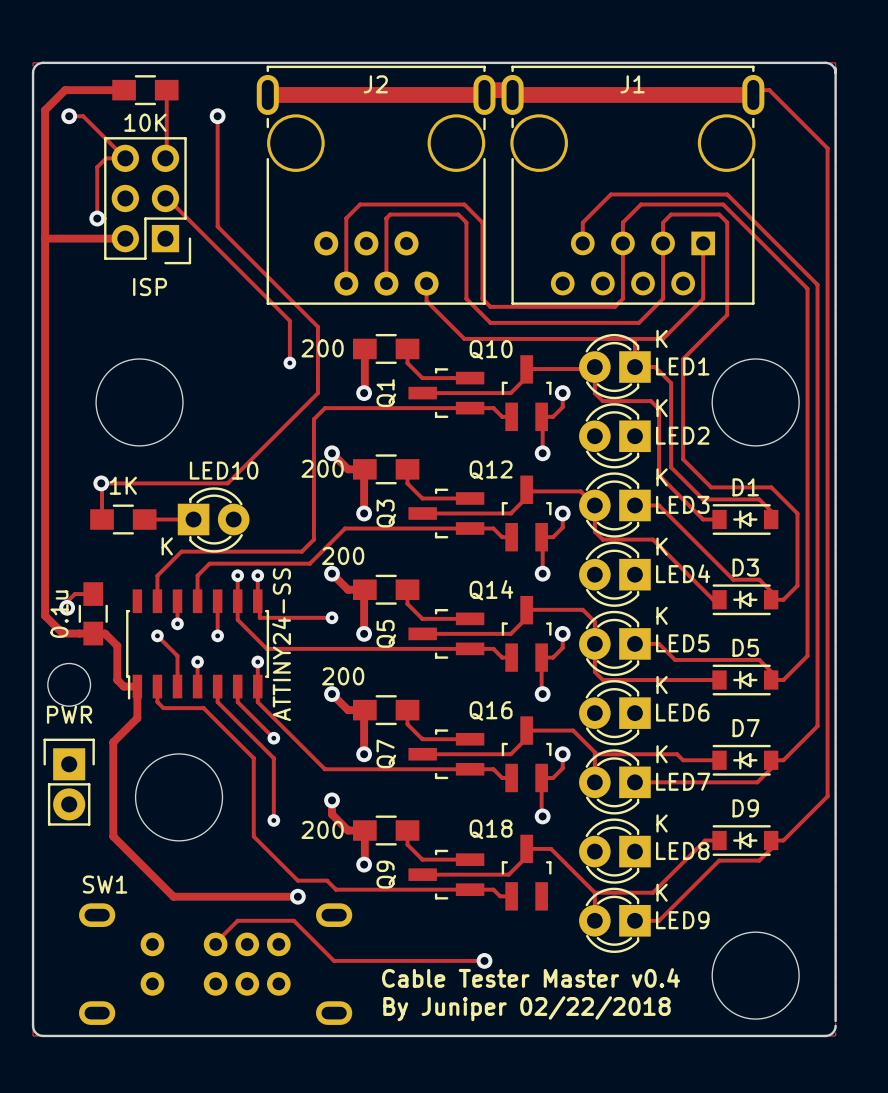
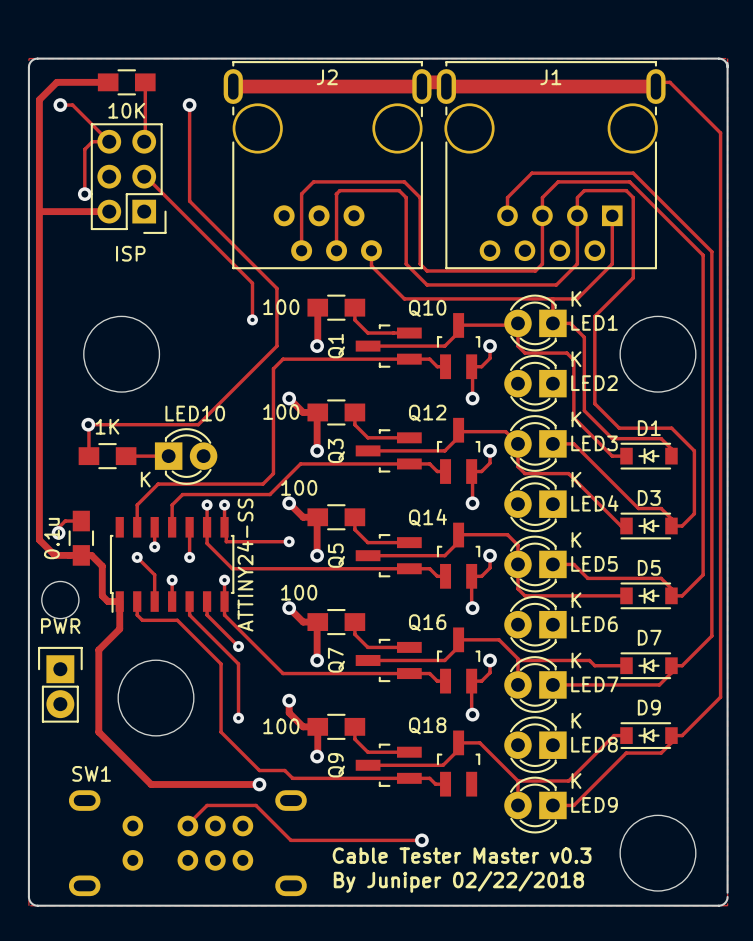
part value: 200 (322, 348) -> 100 (281, 307)
part value: 200 (322, 468) -> 100 (281, 411)
part value: 200 (343, 555) -> 100 (299, 487)
part value: 200 (343, 676) -> 100 (299, 592)
part value: 200 (322, 829) -> 100 (281, 726)
text: Cable Tester Master v0.4 (531, 978) -> Cable Tester Master v0.3 (462, 855)

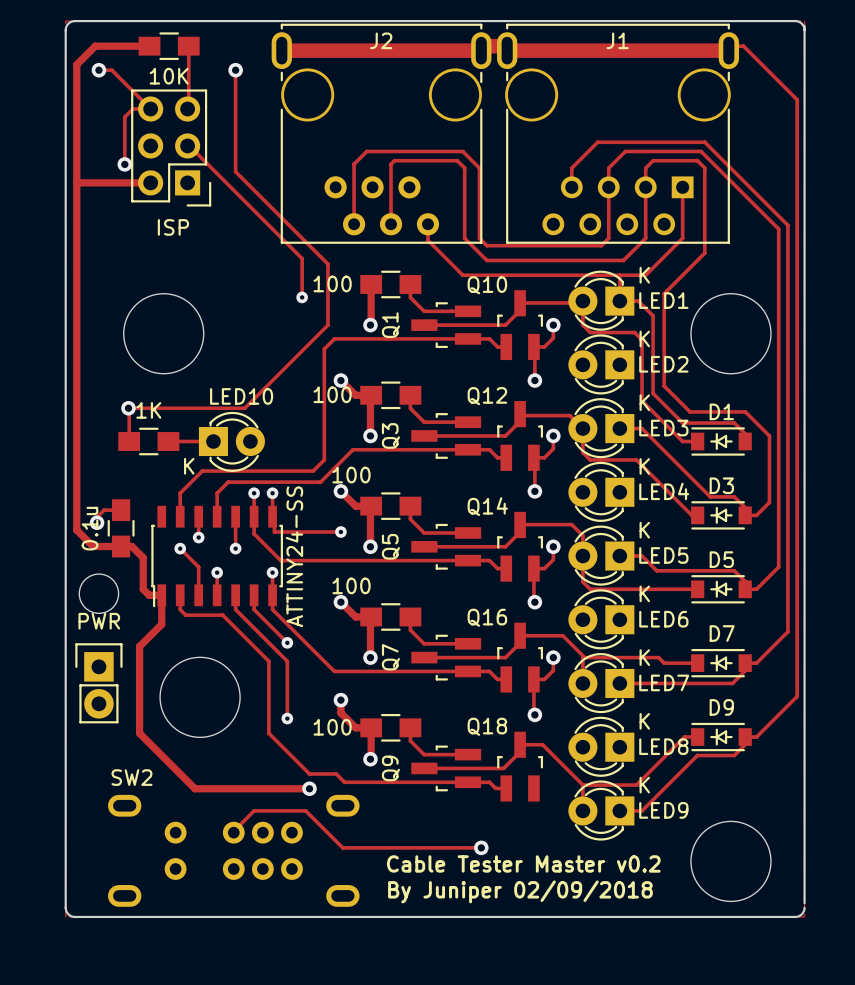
SW1 name: SW1 (91, 773) -> SW2 (131, 777)
text: Cable Tester Master v0.3 (462, 855) -> Cable Tester Master v0.2 (523, 863)
text: By Juniper 02/22/2018 (458, 882) -> By Juniper 02/09/2018 (520, 891)

